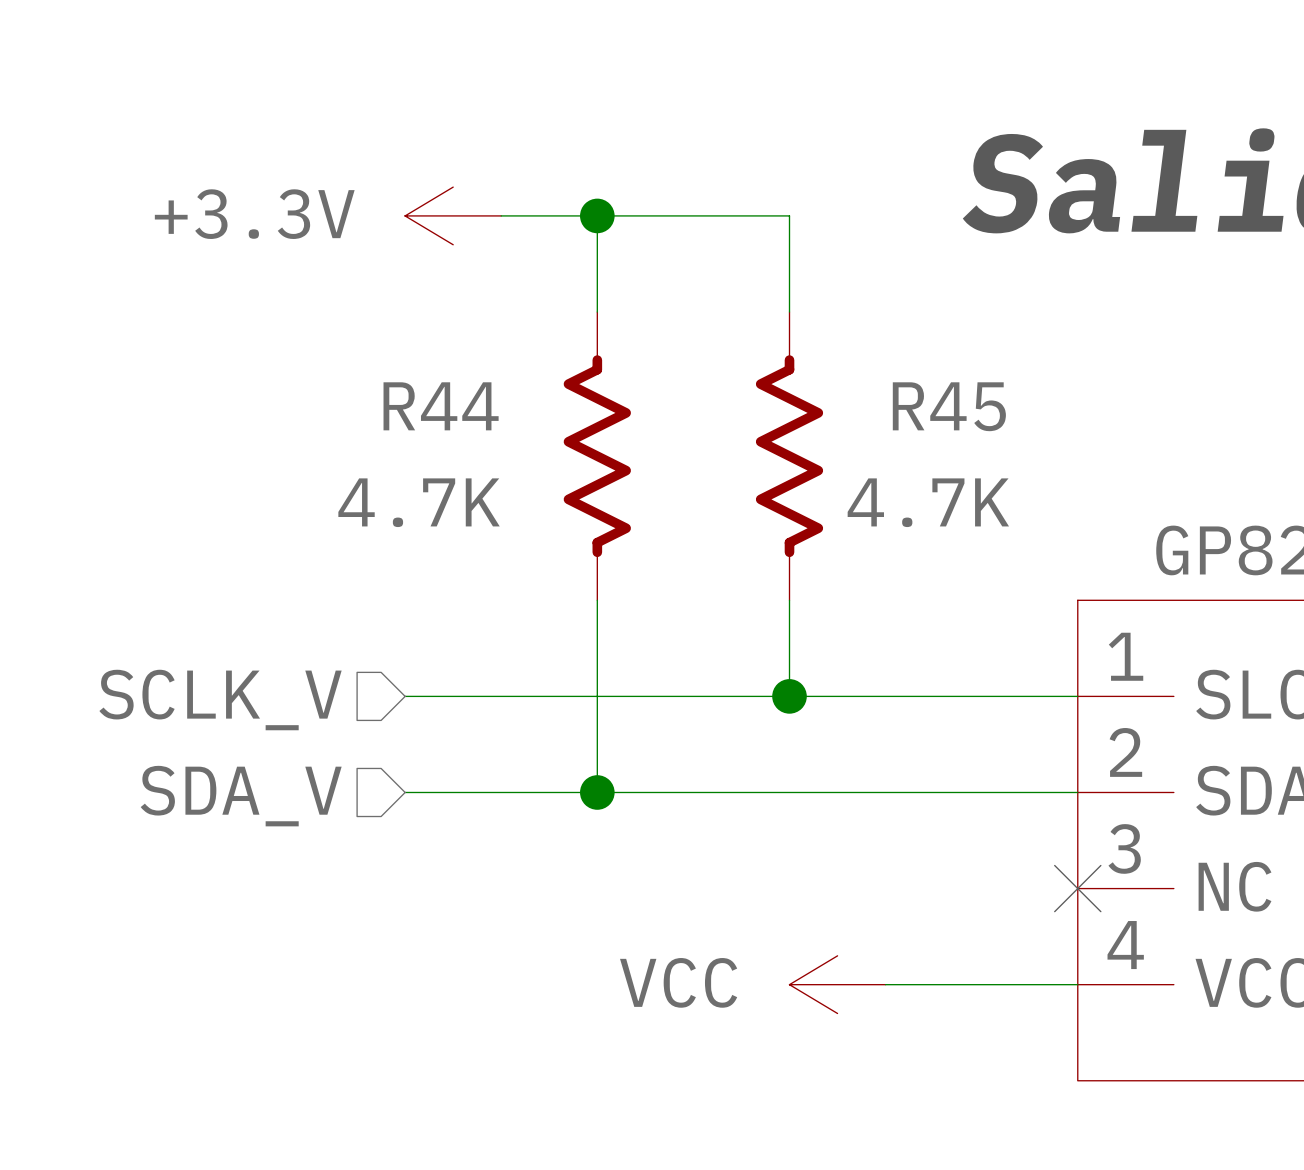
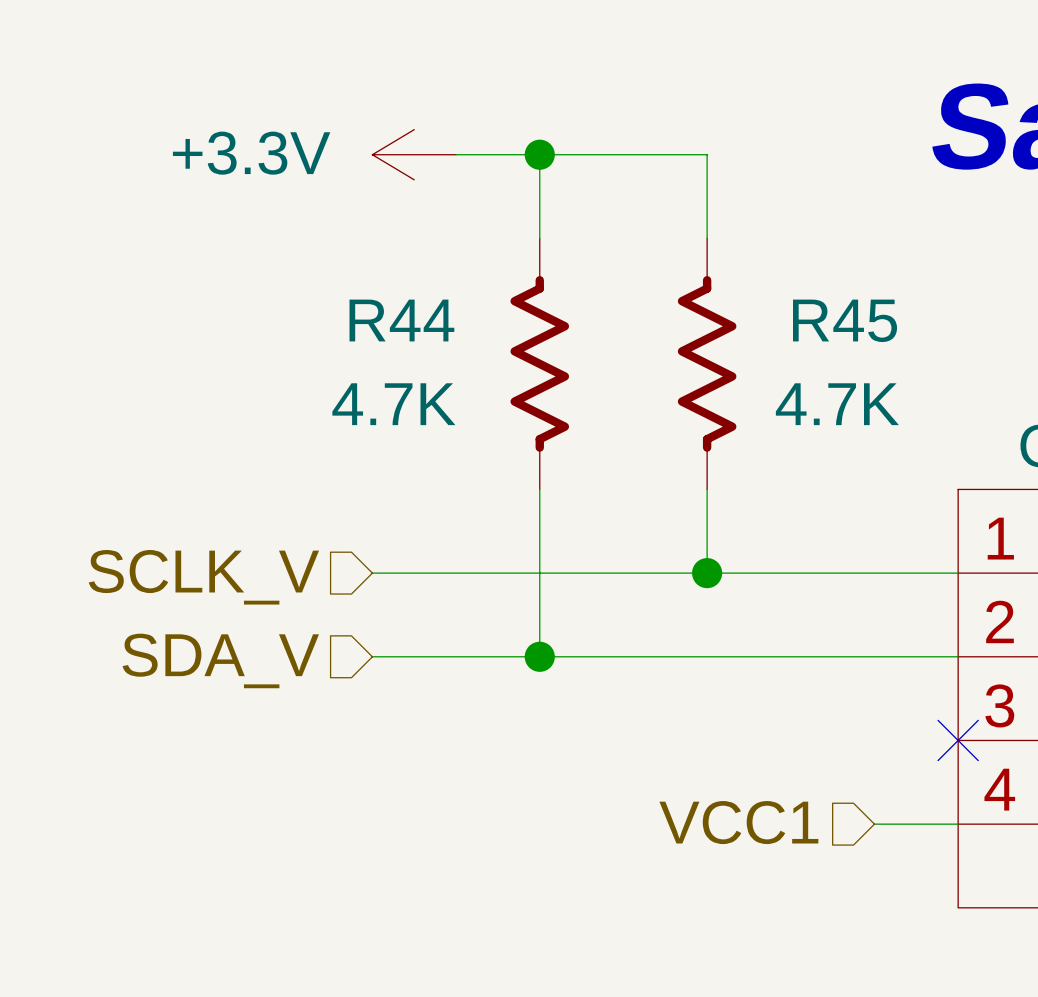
hierarchical label: none -> VCC1 (738, 822)
power symbol: VCC (837, 984) -> none
wire: (885, 984) (981, 984) -> none

